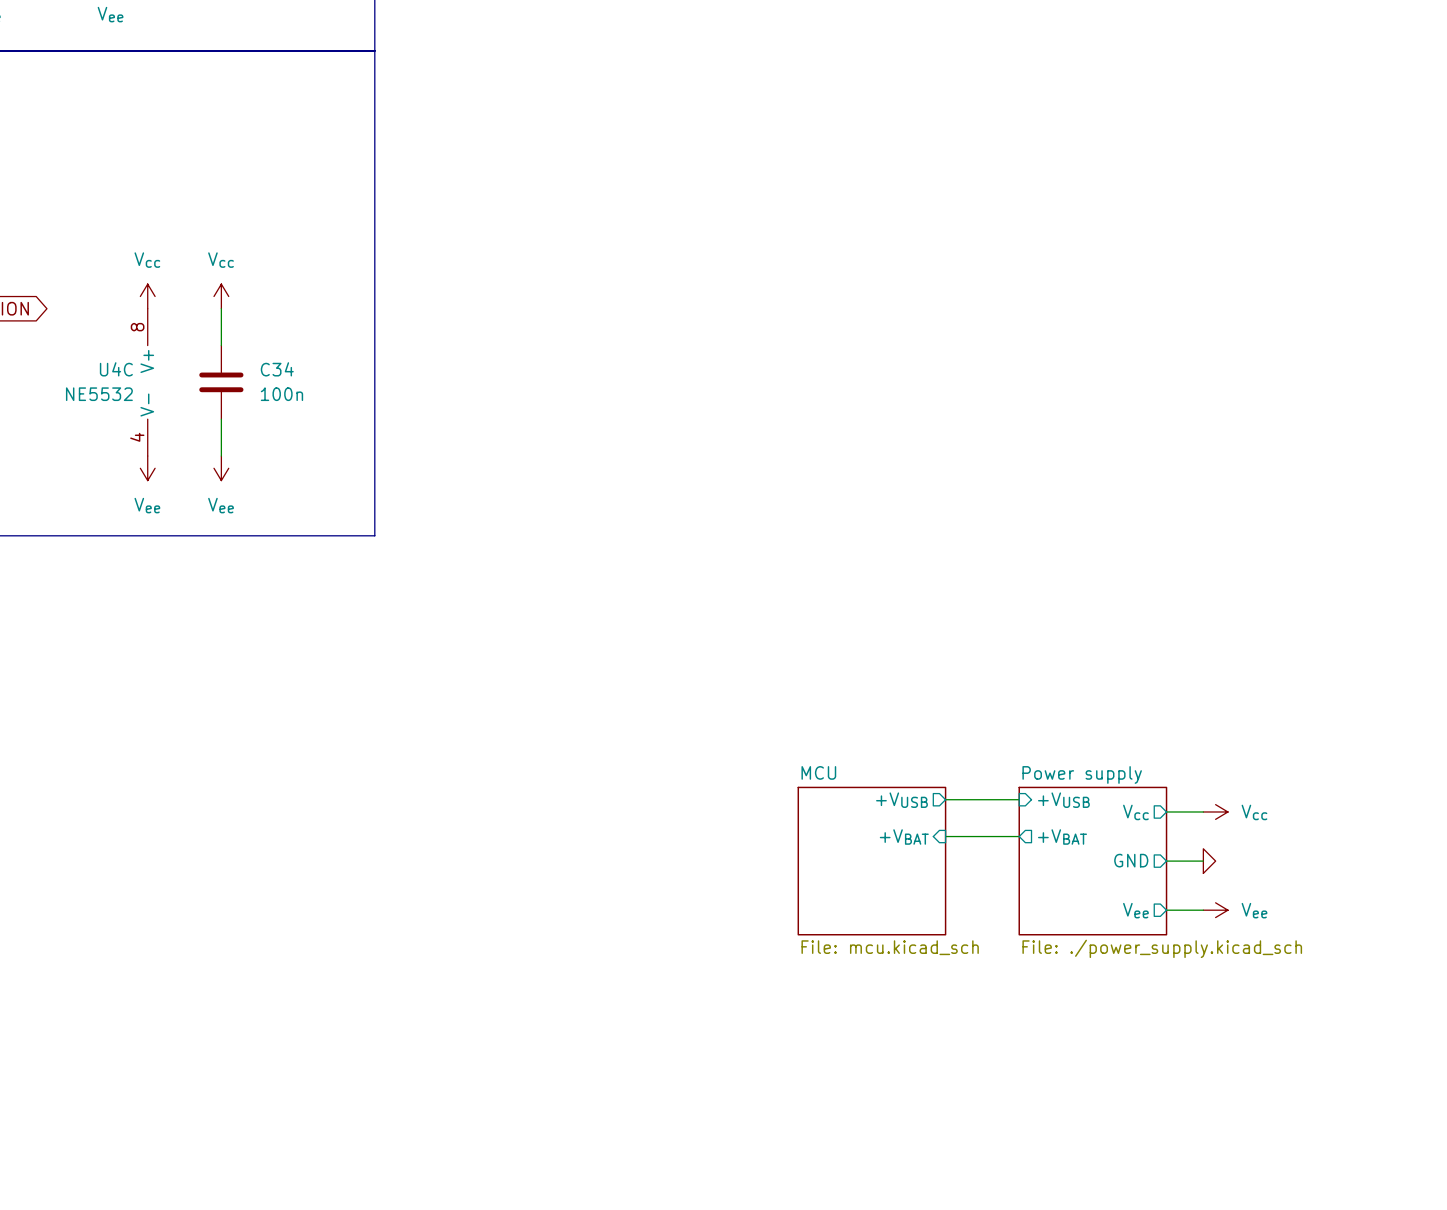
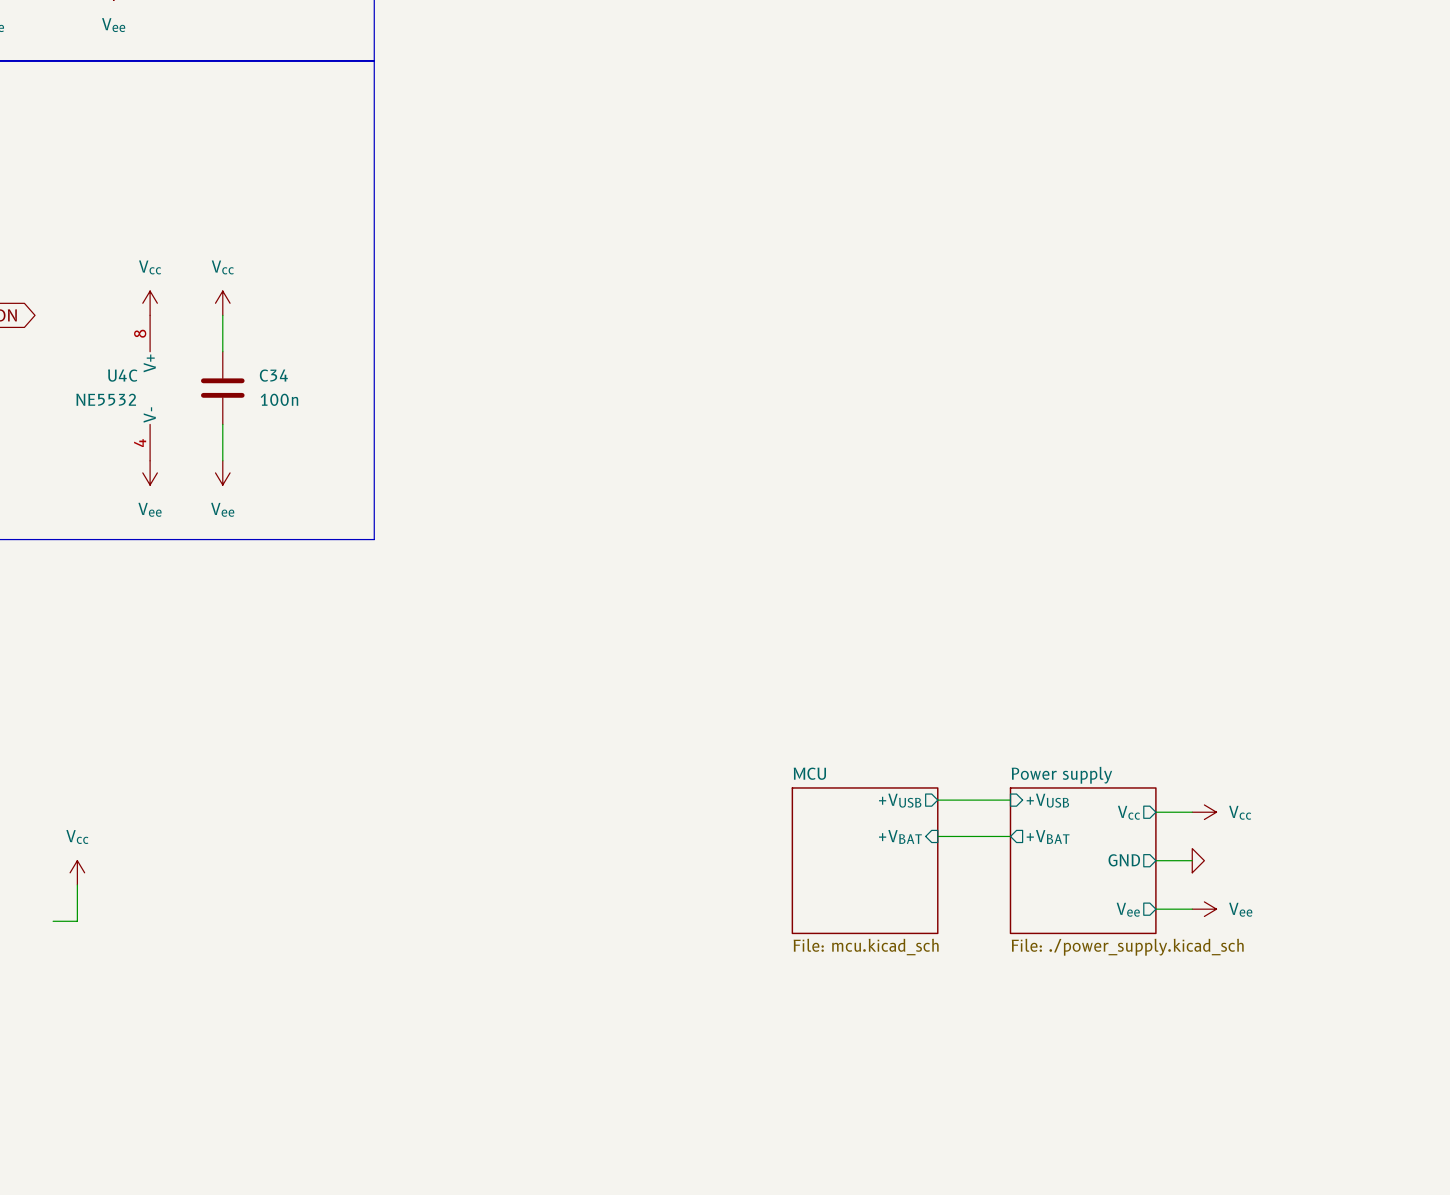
power symbol: none -> Vcc (77, 872)
wire: none -> (77, 884) (77, 921) (53, 921)

